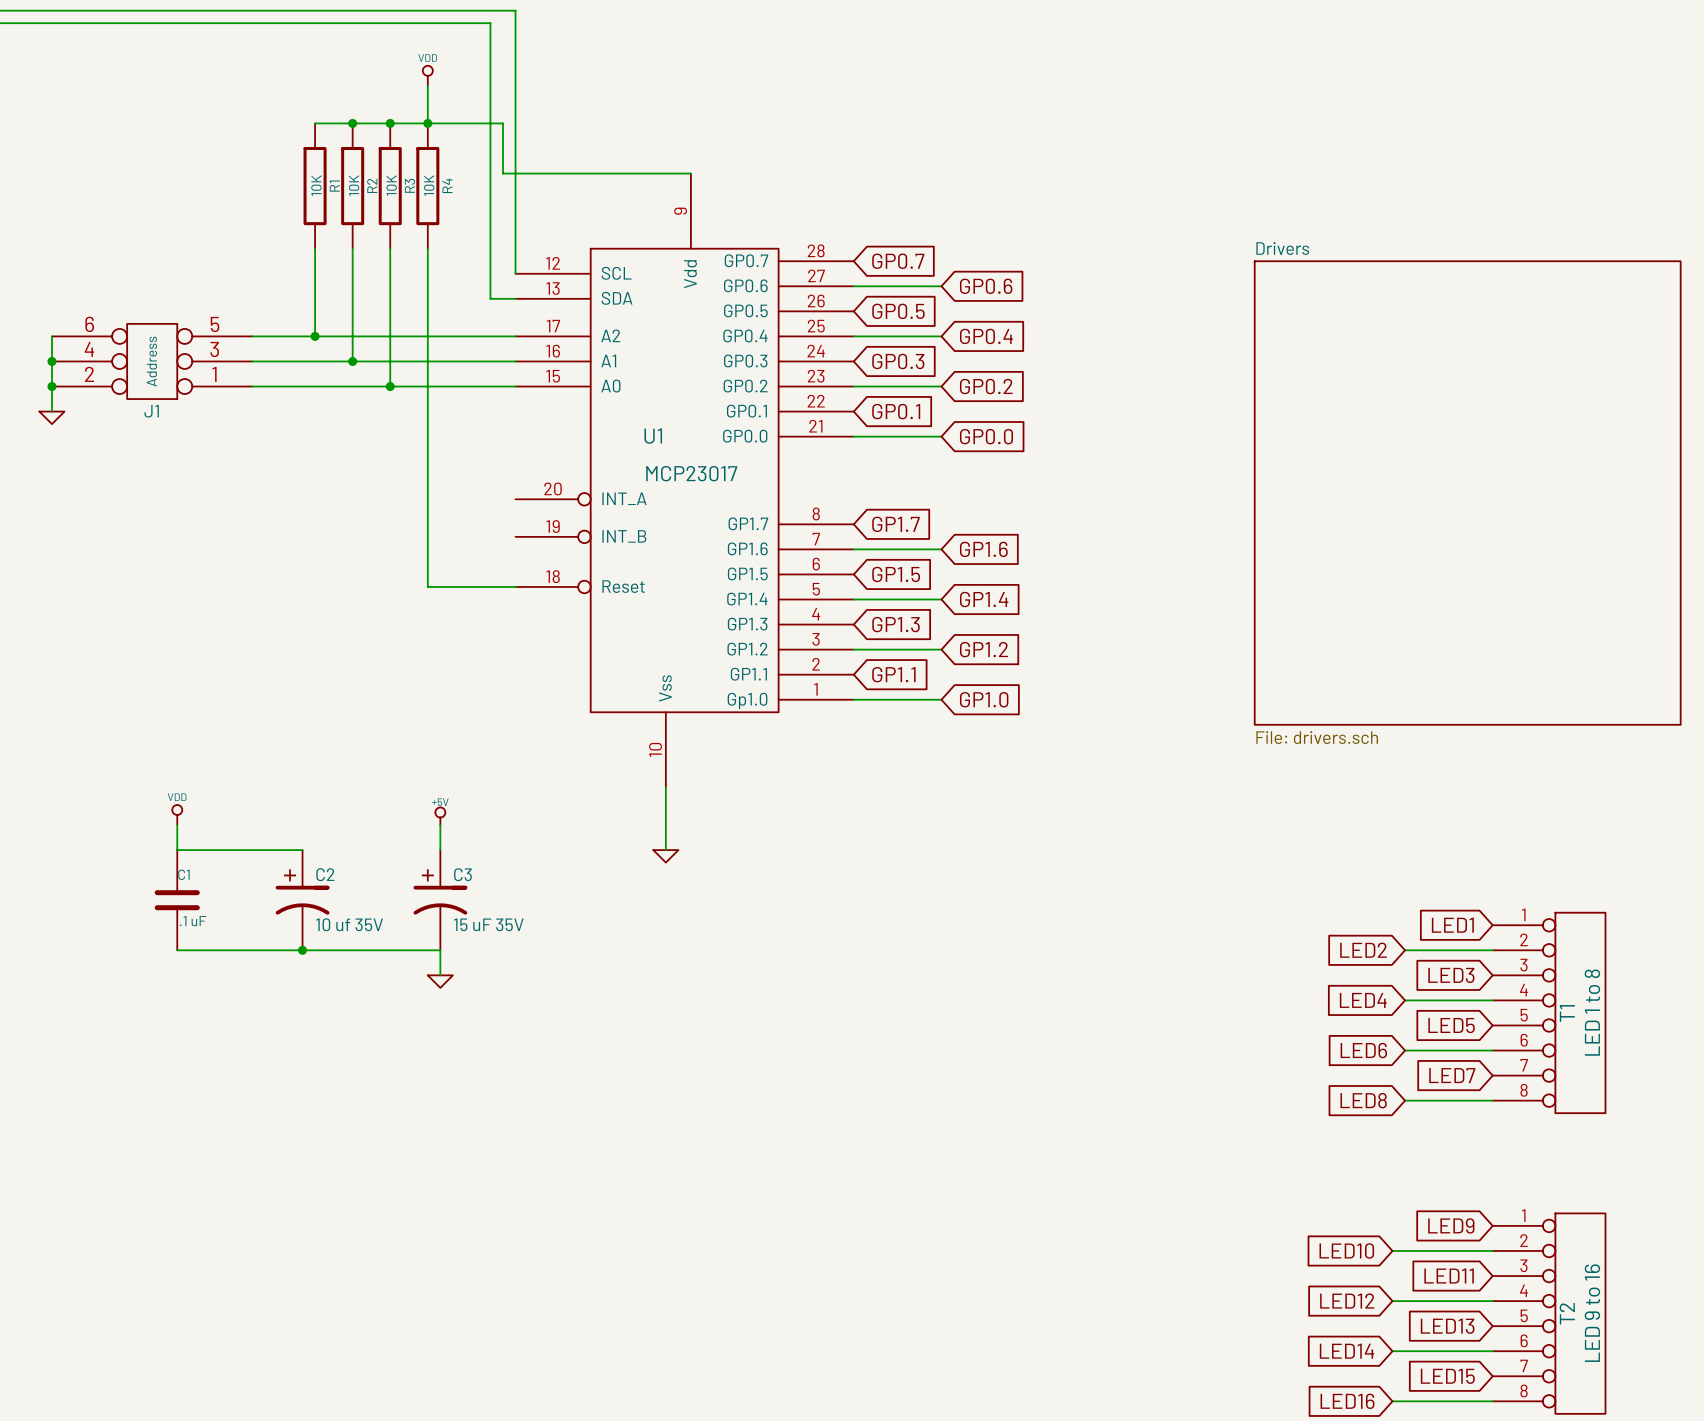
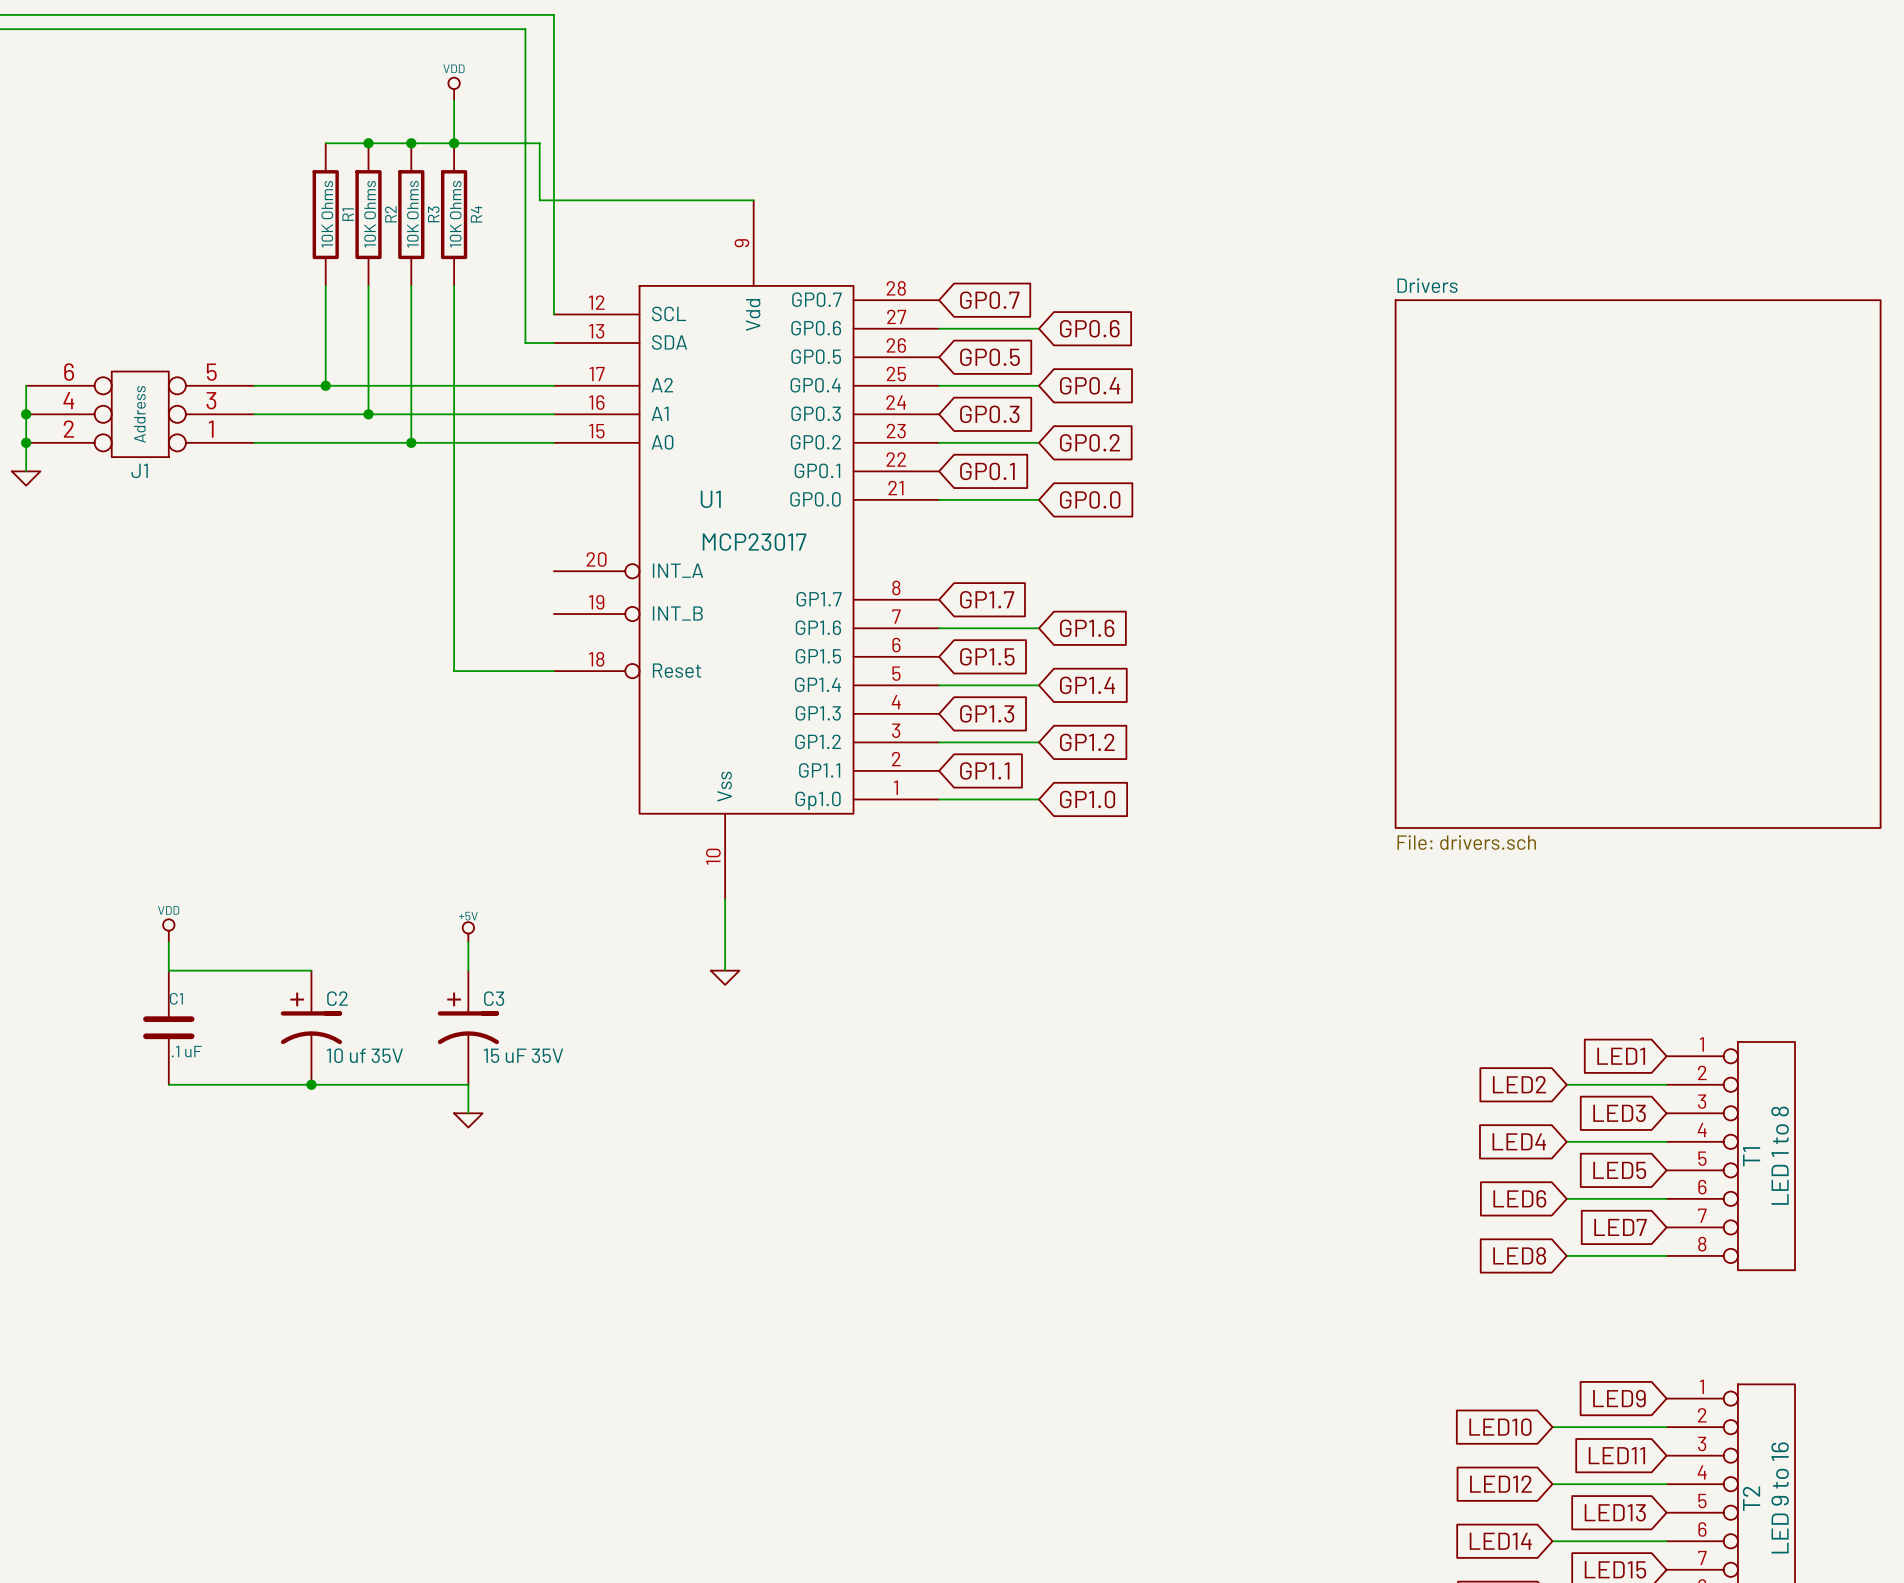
R1 value: 10K (316, 185) -> 10K Ohms (327, 214)
R2 value: 10K (354, 185) -> 10K Ohms (370, 214)
R3 value: 10K (391, 185) -> 10K Ohms (412, 214)
R4 value: 10K (429, 185) -> 10K Ohms (455, 214)

